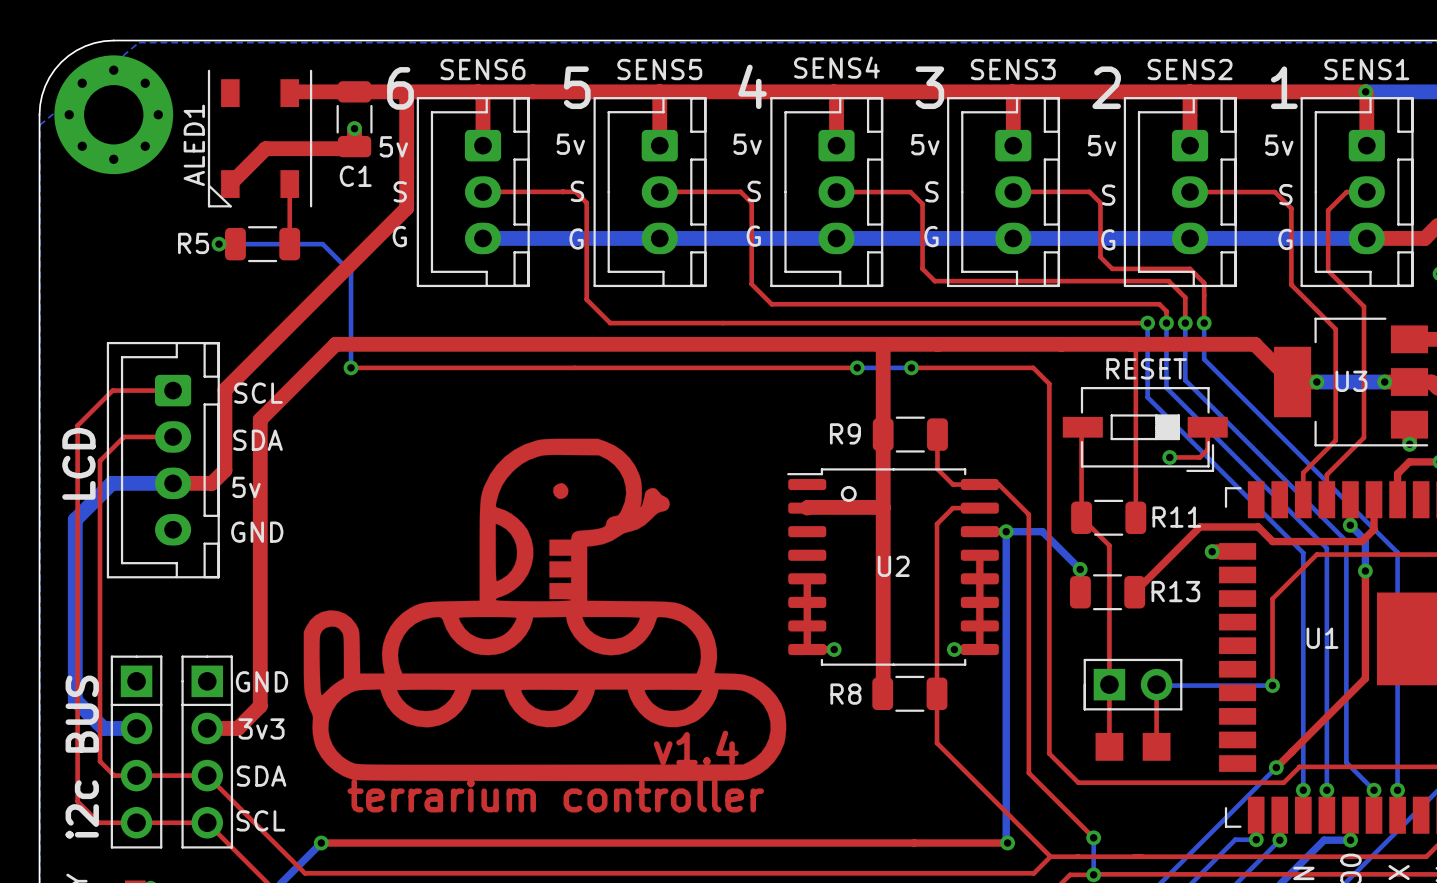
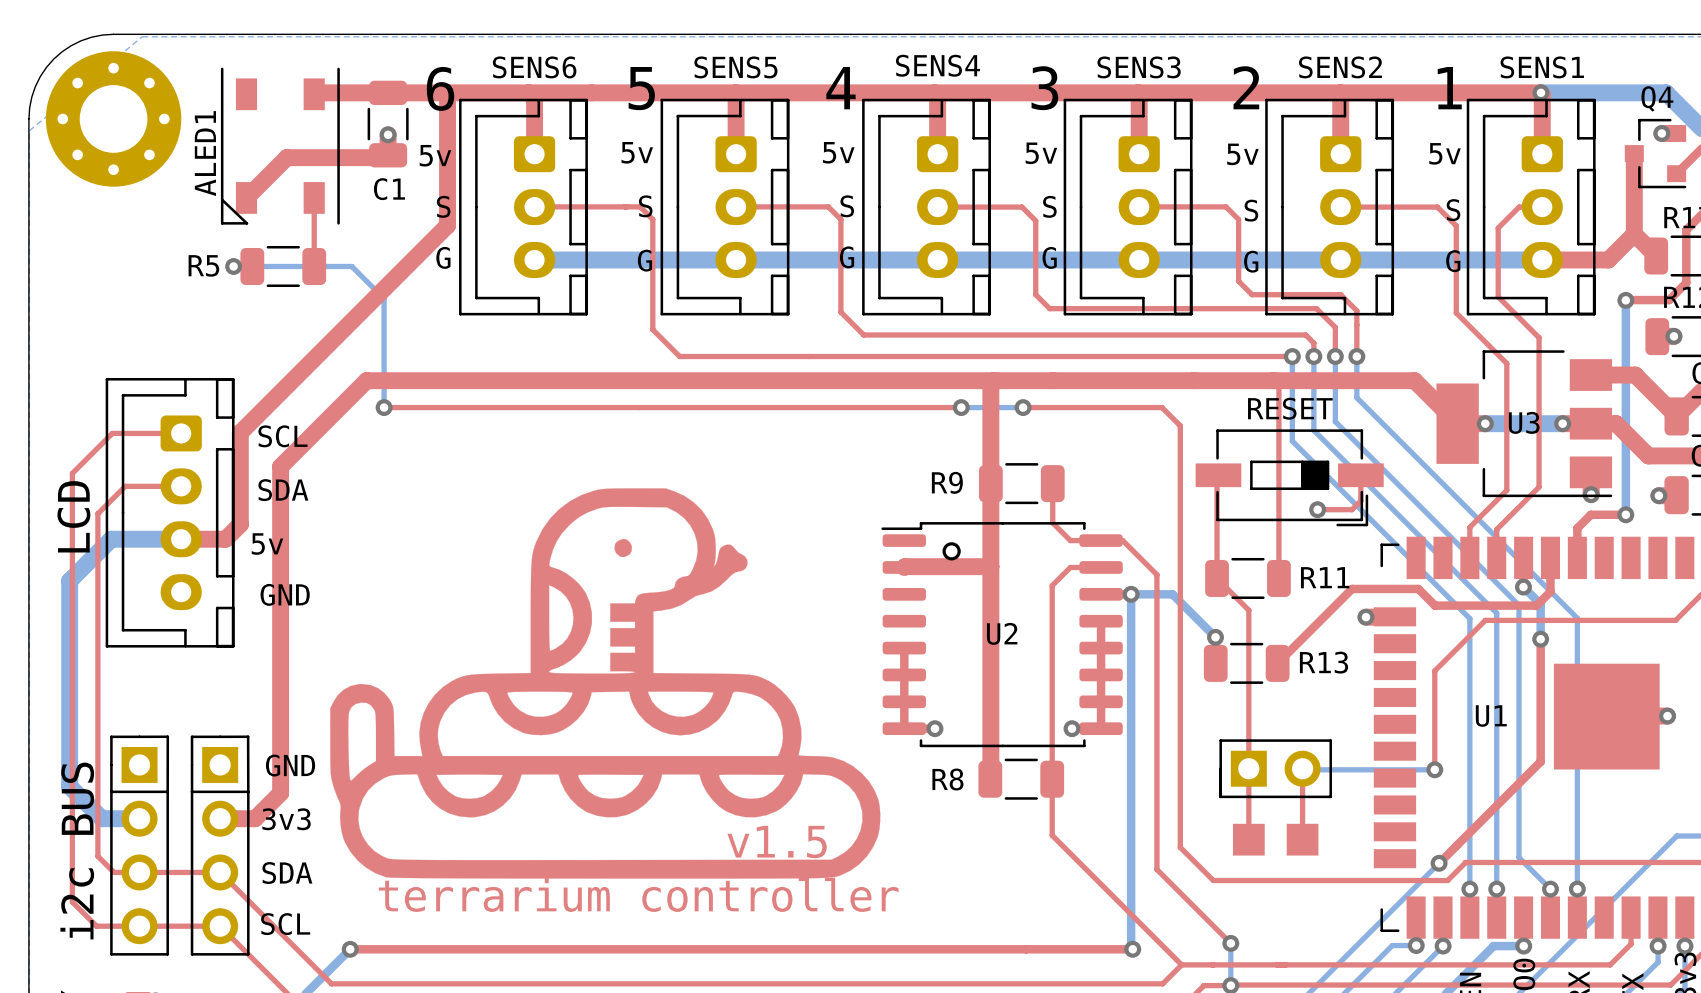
text: v1.4 (696, 747) -> v1.5 (777, 842)

